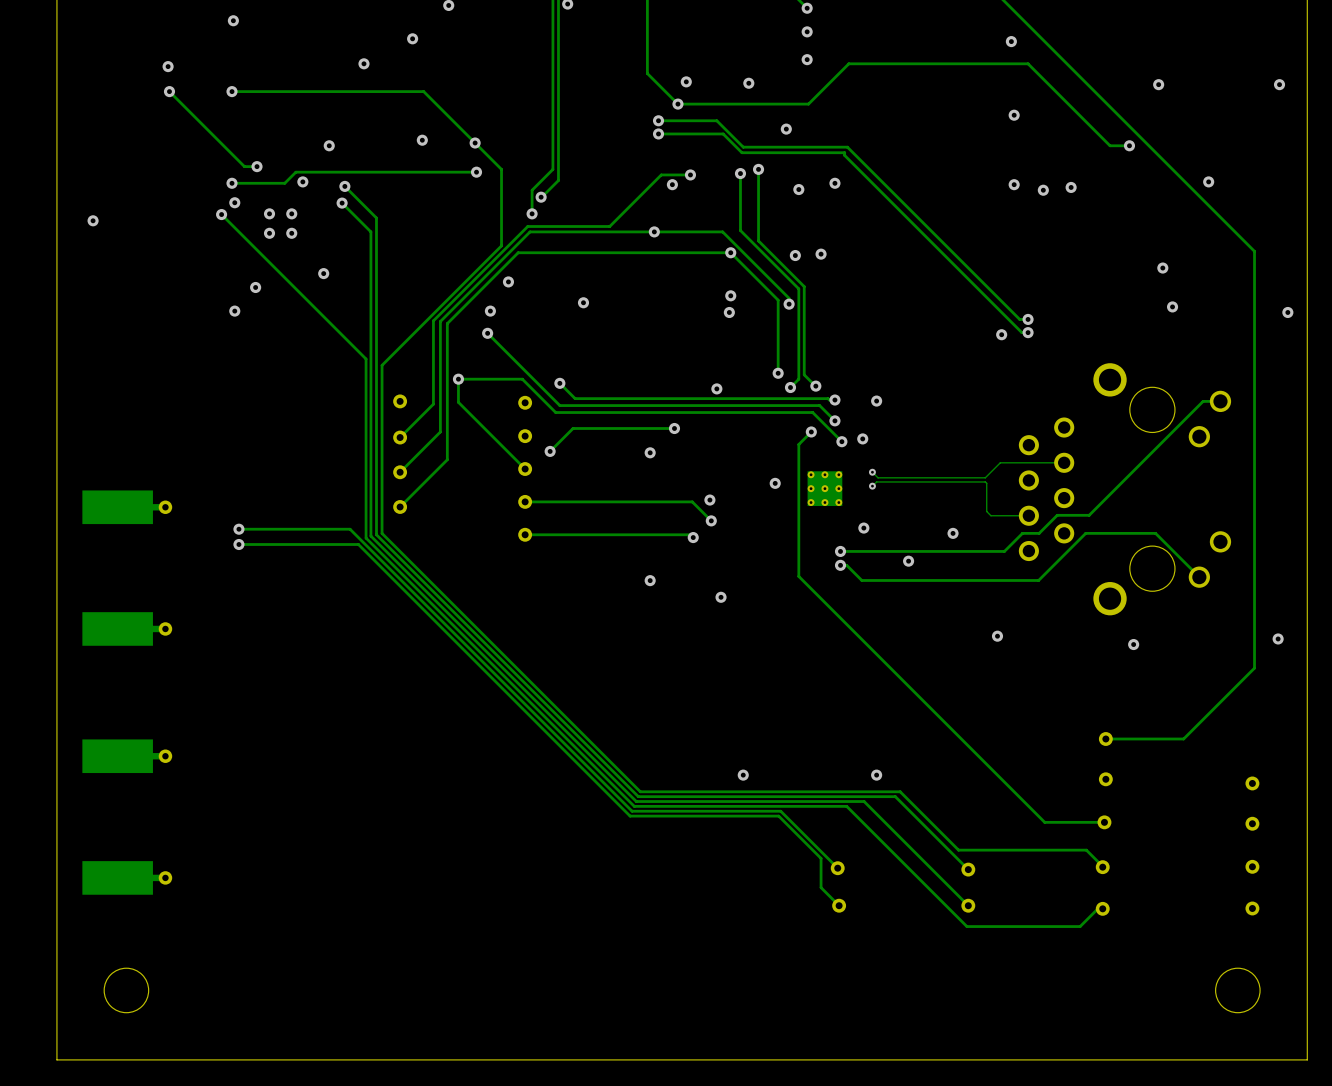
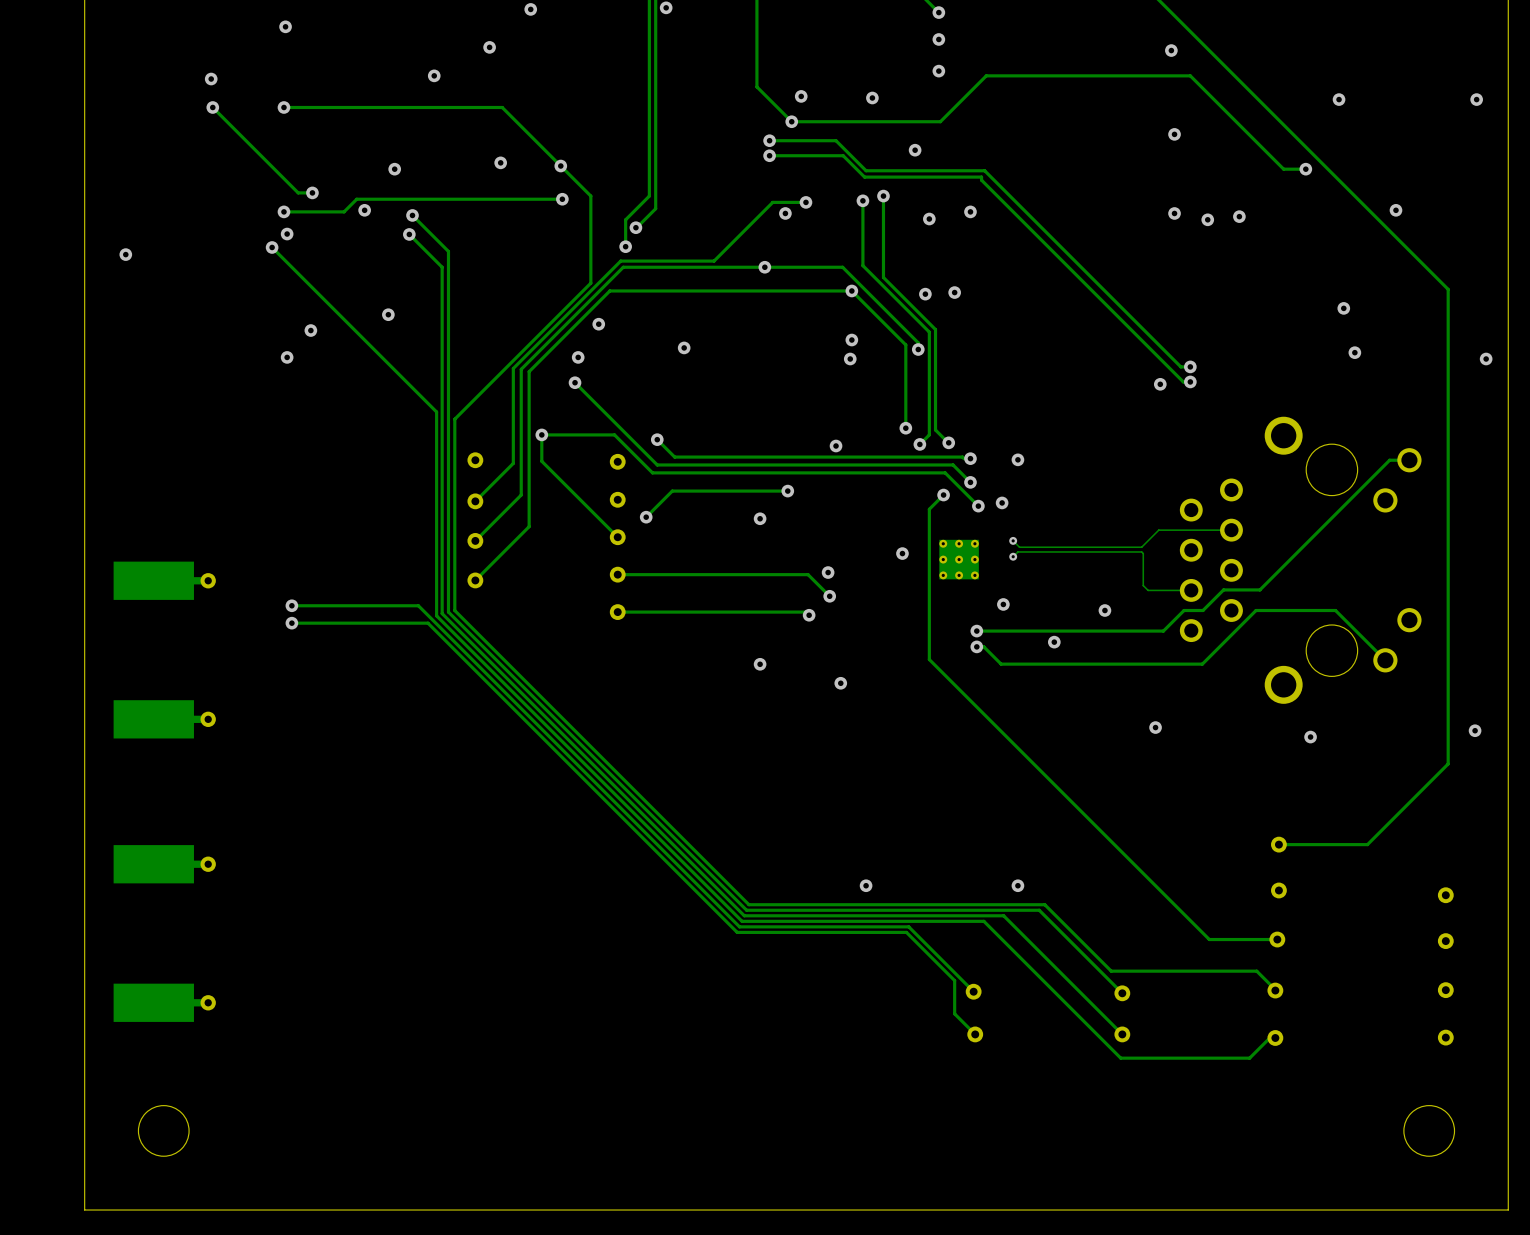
via: (269, 213) -> none
via: (291, 213) -> none
via: (269, 233) -> none
via: (291, 233) -> none

